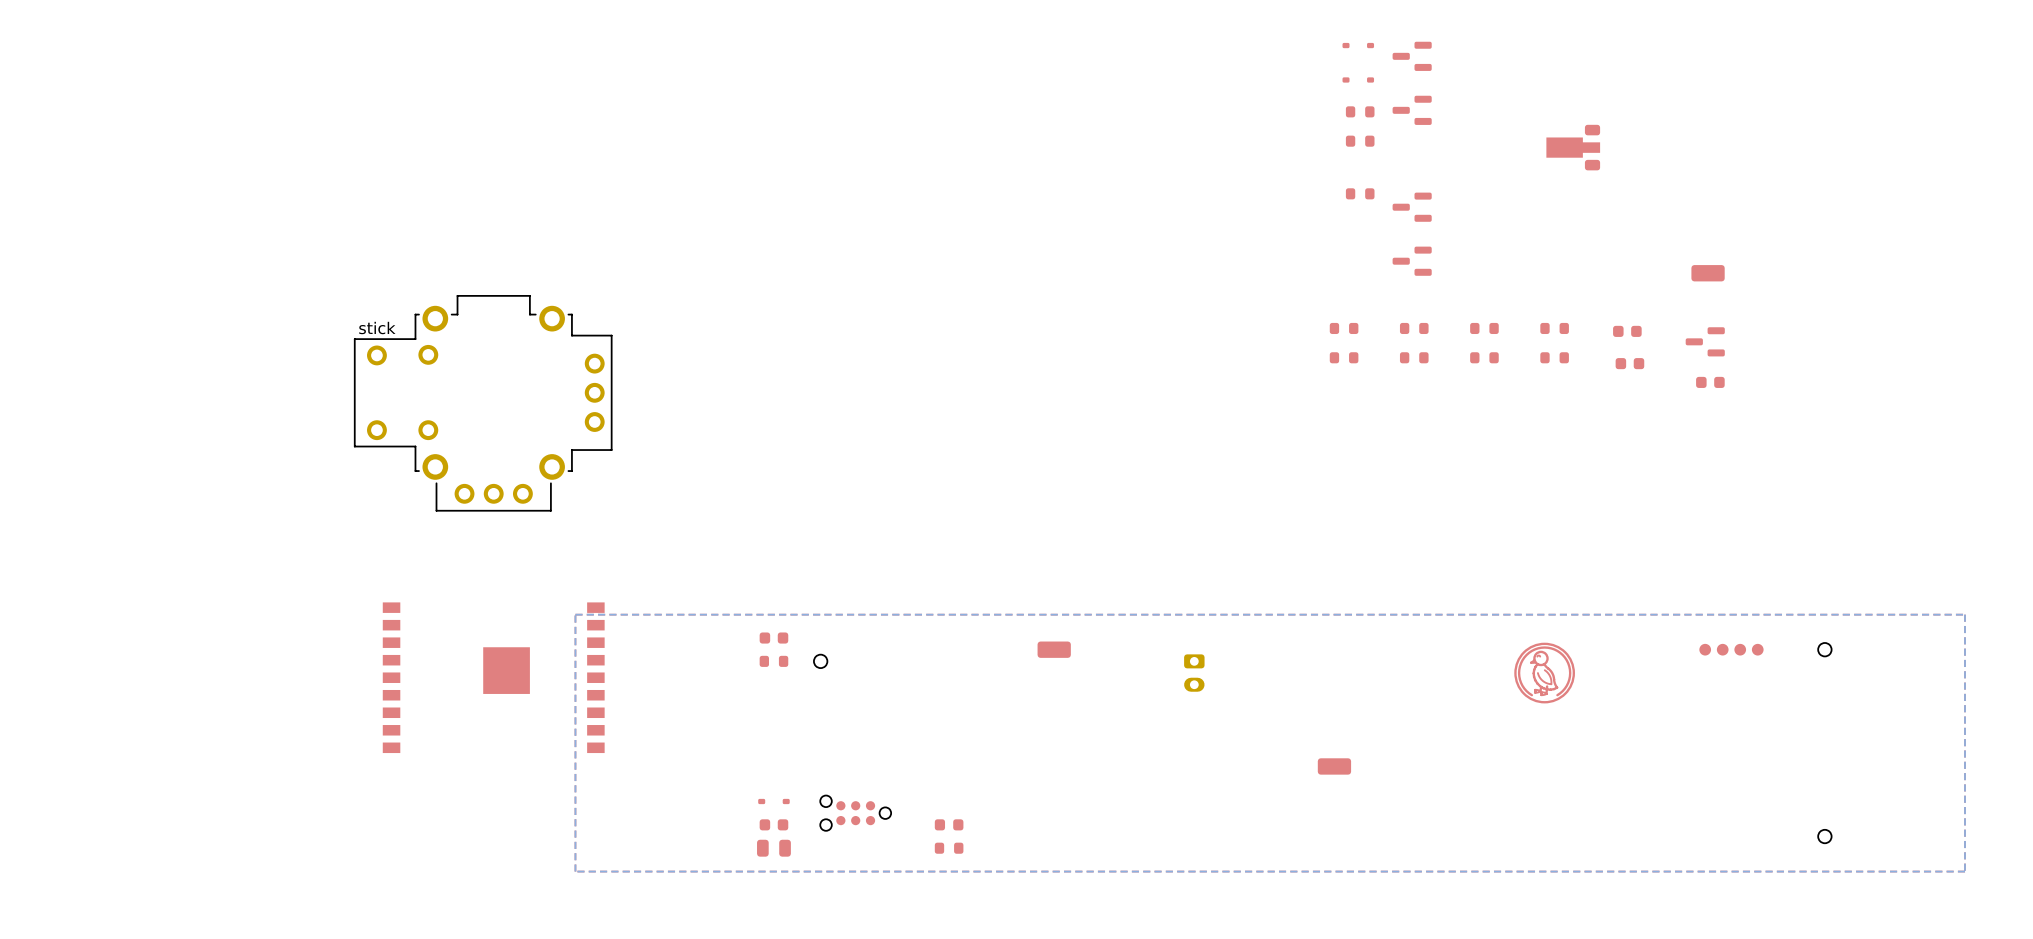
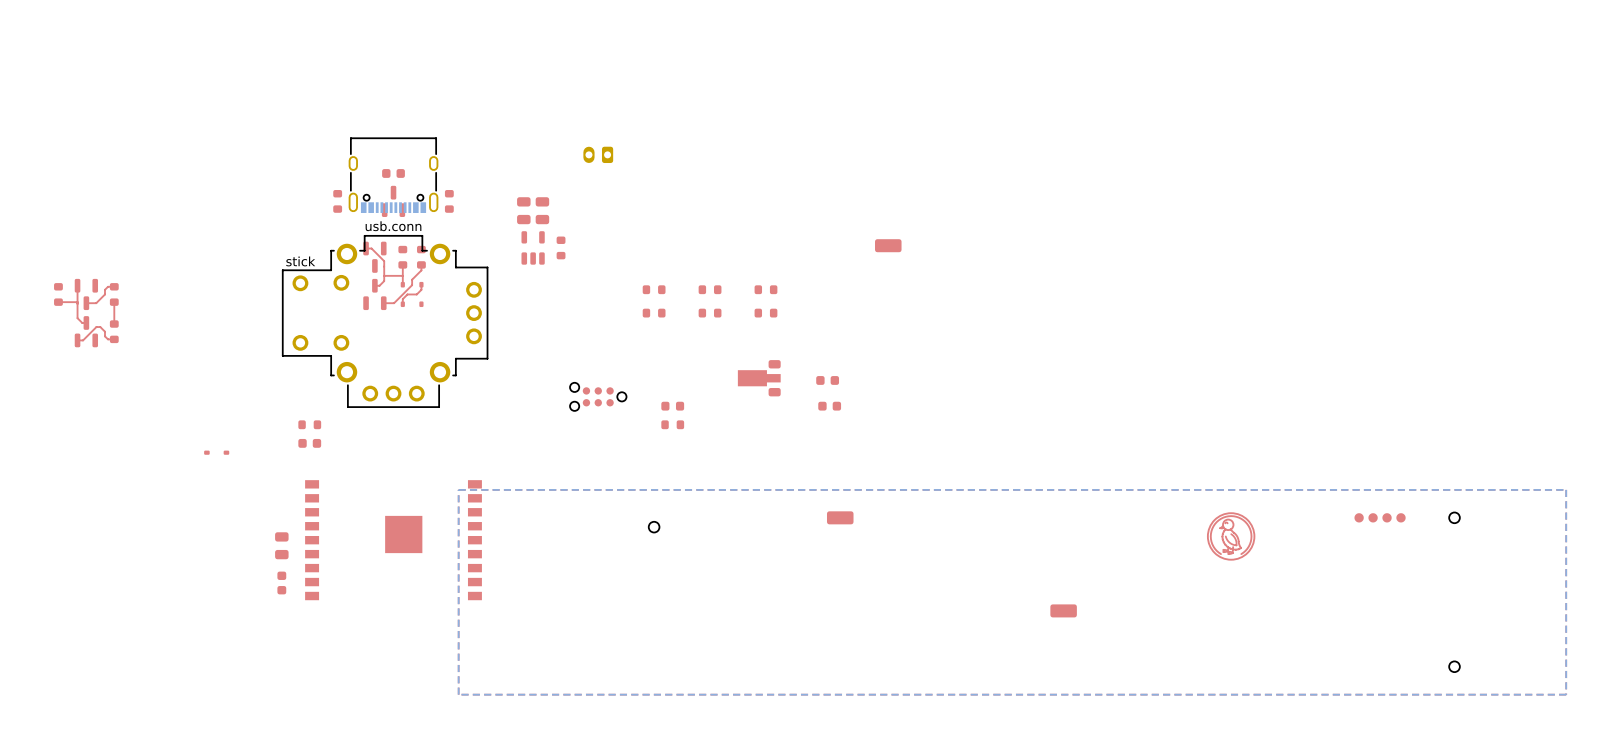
part: (1358, 45) -> none
part: (1412, 56) -> none
part: (1358, 79) -> none
part: (1412, 110) -> none
part: (1360, 111) -> none
part: (1360, 141) -> none
part: (1573, 147) -> none
part: (1360, 193) -> none
part: none -> (598, 154)
part: (1412, 207) -> none
part: none -> (393, 173)
usb.conn: none -> (393, 175)
part: none -> (337, 201)
part: none -> (393, 201)
part: none -> (449, 201)
part: (1412, 261) -> none
part: none -> (523, 210)
part: none -> (542, 210)
part: (1708, 273) -> none
part: none -> (888, 245)
top track: none -> (366, 248) (371, 248) (384, 261) (384, 281) (379, 285) (374, 285)
part: none -> (533, 247)
part: none -> (561, 247)
part: none -> (374, 257)
part: none -> (402, 257)
part: none -> (421, 257)
part: (1344, 328) -> none
part: (1414, 328) -> none
part: (1484, 328) -> none
part: (1554, 328) -> none
part: (1627, 331) -> none
top track: none -> (402, 264) (402, 284)
top track: none -> (421, 264) (421, 270) (412, 279) (412, 285) (394, 303) (383, 303)
part: (1705, 341) -> none
top track: none -> (402, 275) (384, 275)
top track: none -> (421, 284) (421, 289) (416, 294) (407, 294) (402, 299) (402, 304)
part: (1344, 357) -> none
part: (1414, 357) -> none
part: (1484, 357) -> none
part: (1554, 357) -> none
top track: none -> (77, 285) (77, 318) (82, 322) (86, 322)
top track: none -> (114, 286) (108, 286) (104, 289) (104, 294) (96, 303) (86, 303)
part: none -> (654, 289)
part: none -> (710, 289)
part: none -> (765, 289)
part: (1629, 363) -> none
part: none -> (58, 294)
part: none -> (86, 294)
part: none -> (114, 294)
part: none -> (374, 294)
part: none -> (402, 294)
part: none -> (421, 294)
top track: none -> (77, 302) (58, 302)
top track: none -> (114, 302) (114, 324)
part: (1710, 382) -> none
part: none -> (654, 313)
part: none -> (710, 313)
part: none -> (765, 313)
part: none -> (86, 331)
part: none -> (114, 331)
top track: none -> (114, 339) (108, 339) (104, 336) (104, 331) (100, 327) (96, 327) (83, 340) (77, 340)
part: none -> (759, 378)
part: none -> (827, 380)
part: none -> (598, 396)
part: none -> (672, 406)
part: none -> (829, 406)
part: none -> (309, 424)
part: none -> (672, 424)
part: none -> (309, 443)
part: none -> (216, 452)
part: (773, 638) -> none
part: (773, 661) -> none
part: (1194, 673) -> none
part: none -> (281, 545)
part: none -> (281, 582)
part: (773, 801) -> none
part: (855, 813) -> none
part: (773, 824) -> none
part: (949, 824) -> none
part: (773, 848) -> none
part: (949, 848) -> none

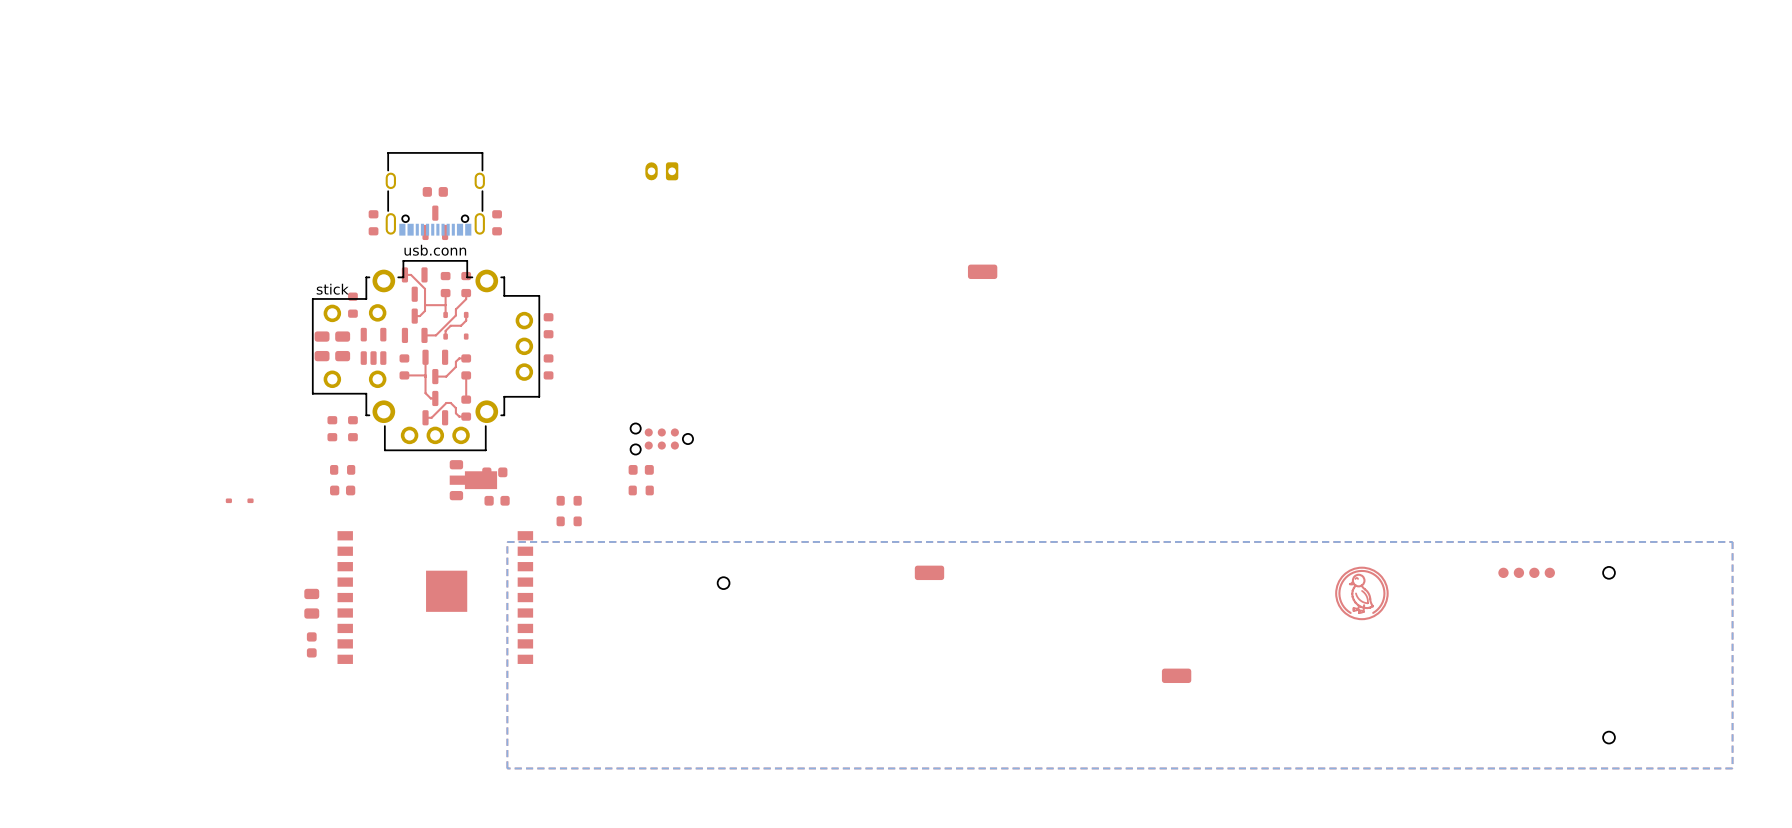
part: (523, 210) -> none
part: (542, 210) -> none
part position: (533, 247) -> (373, 346)
part: (561, 247) -> none
part: none -> (352, 305)
top track: (77, 285) (77, 318) (82, 322) (86, 322) -> none
top track: (114, 286) (108, 286) (104, 289) (104, 294) (96, 303) (86, 303) -> none
part: (654, 289) -> none
part: (710, 289) -> none
part: (765, 289) -> none
part: (58, 294) -> none
part: (86, 294) -> none
part: (114, 294) -> none
part: none -> (548, 325)
top track: (77, 302) (58, 302) -> none
top track: (114, 302) (114, 324) -> none
part: none -> (322, 346)
part: none -> (342, 346)
part: (654, 313) -> none
part: (710, 313) -> none
part: (765, 313) -> none
top track: none -> (425, 357) (425, 393) (430, 398) (435, 398)
top track: none -> (466, 358) (459, 358) (455, 361) (455, 366) (446, 376) (435, 376)
part: (86, 331) -> none
part: (114, 331) -> none
part: none -> (404, 366)
part: none -> (435, 366)
part: none -> (466, 366)
part: none -> (548, 366)
top track: (114, 339) (108, 339) (104, 336) (104, 331) (100, 327) (96, 327) (83, 340) (77, 340) -> none
top track: none -> (425, 375) (404, 375)
top track: none -> (466, 375) (466, 399)
part: none -> (435, 408)
part: none -> (466, 408)
top track: none -> (466, 416) (459, 416) (455, 413) (455, 408) (450, 402) (446, 402) (431, 417) (425, 417)
part: (759, 378) -> none
part: (827, 380) -> none
part: none -> (332, 428)
part: none -> (352, 428)
part position: (672, 406) -> (641, 469)
part: (829, 406) -> none
part: (672, 424) -> none
part: none -> (494, 472)
part: none -> (473, 480)
part: none -> (641, 490)
part: none -> (497, 500)
part: none -> (569, 500)
part: none -> (569, 521)

